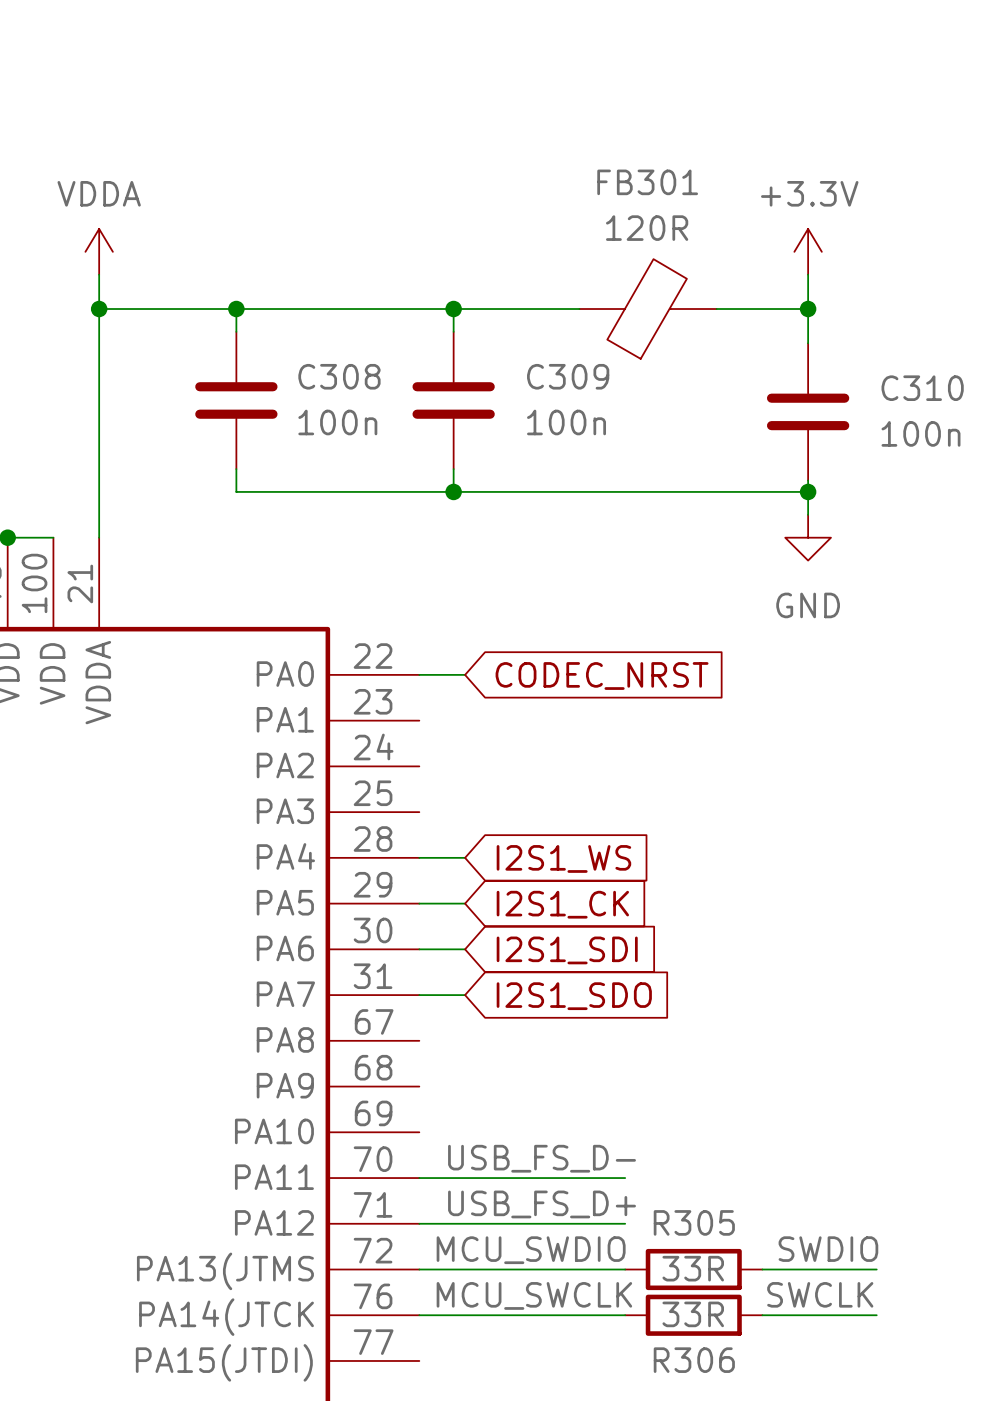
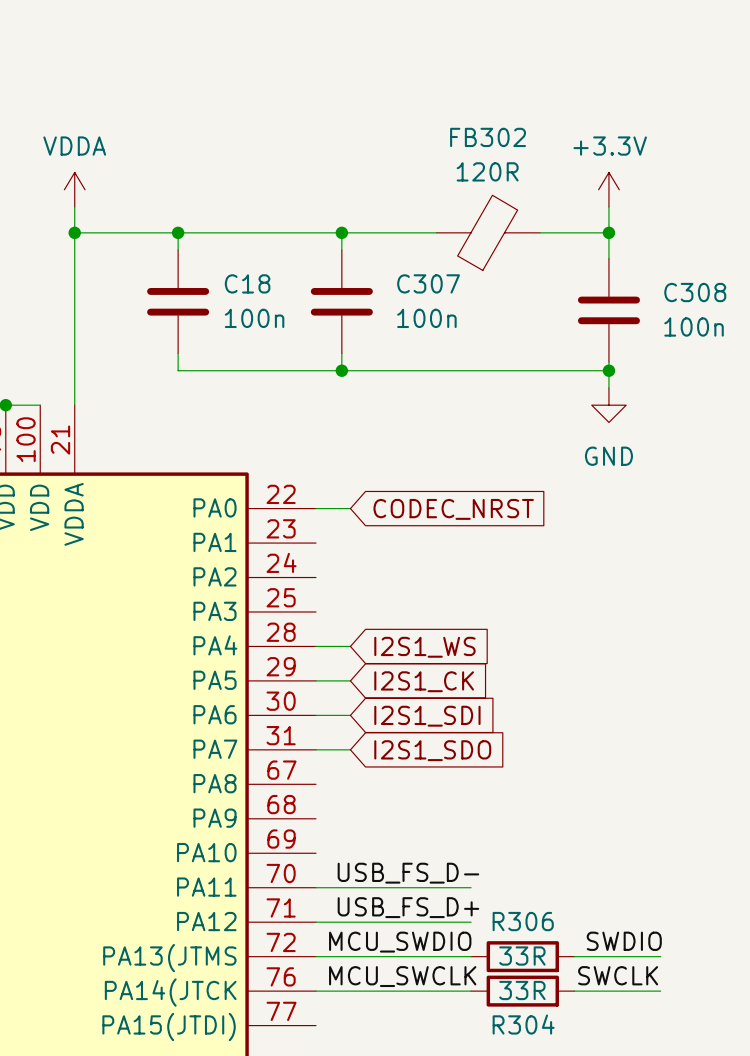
FB301 name: FB301 (647, 182) -> FB302 (488, 137)
C308 name: C308 (339, 376) -> C18 (247, 283)
C309 name: C309 (568, 376) -> C307 (428, 283)
C310 name: C310 (922, 388) -> C308 (695, 292)
R305 name: R305 (694, 1222) -> R306 (523, 921)
R306 name: R306 (694, 1360) -> R304 (523, 1024)

